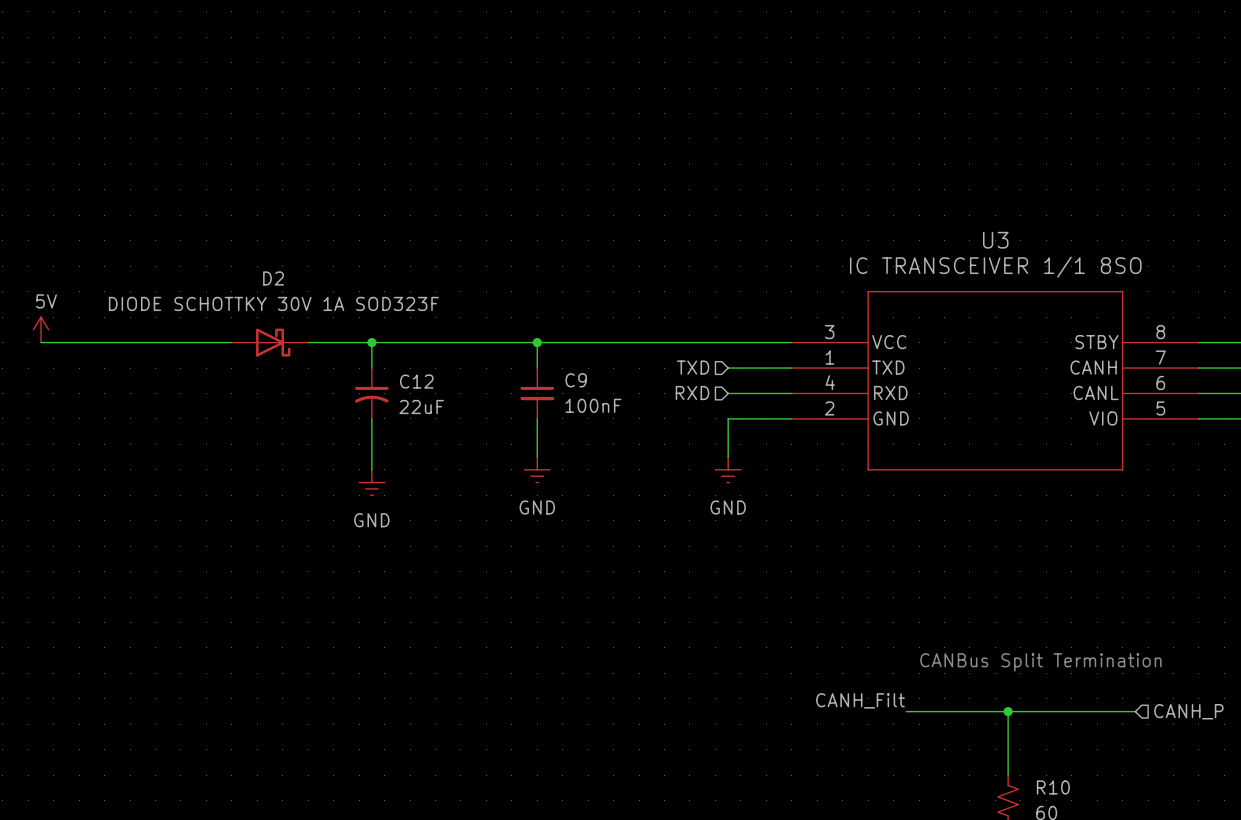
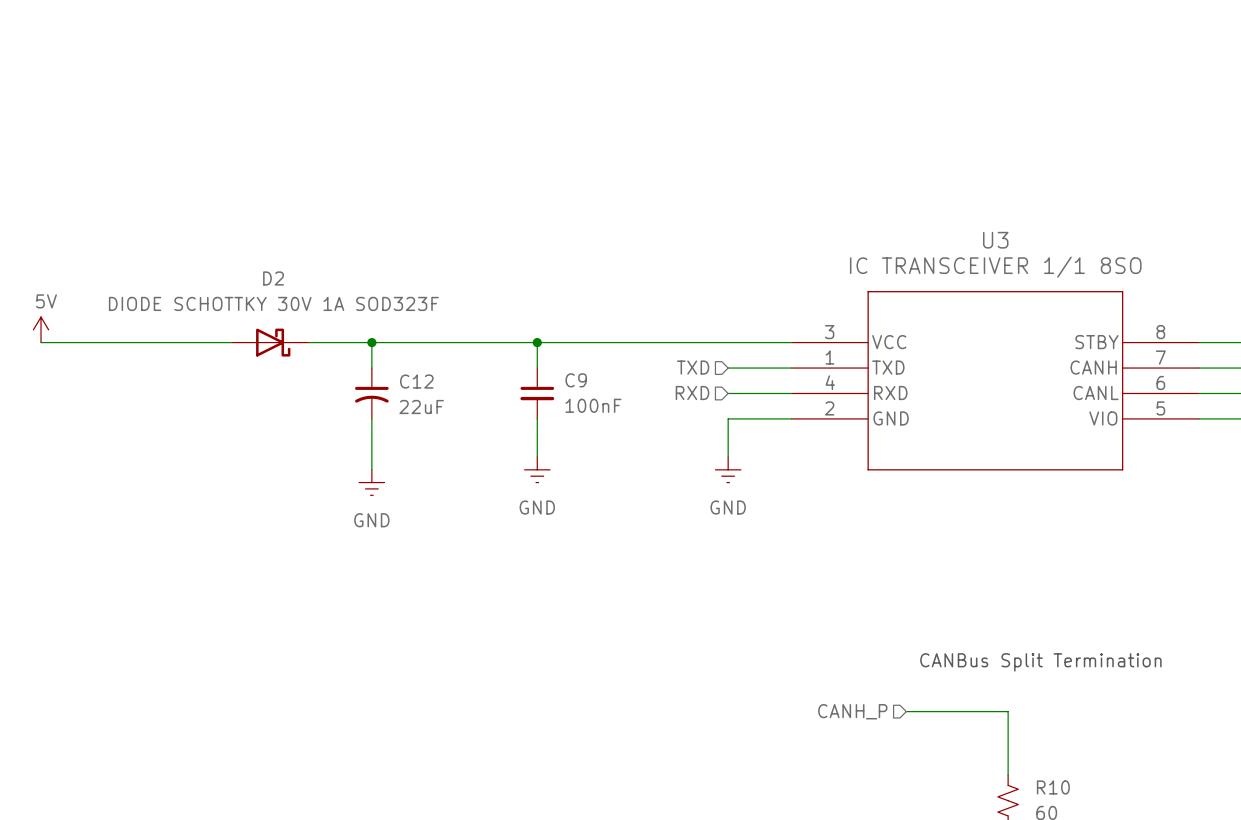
label: CANH_Filt (860, 700) -> none
hierarchical label: none -> CANH_P (852, 711)
wire: (1008, 711) (1135, 711) -> none
junction: (1008, 711) -> none
hierarchical label: CANH_P (1188, 711) -> none

